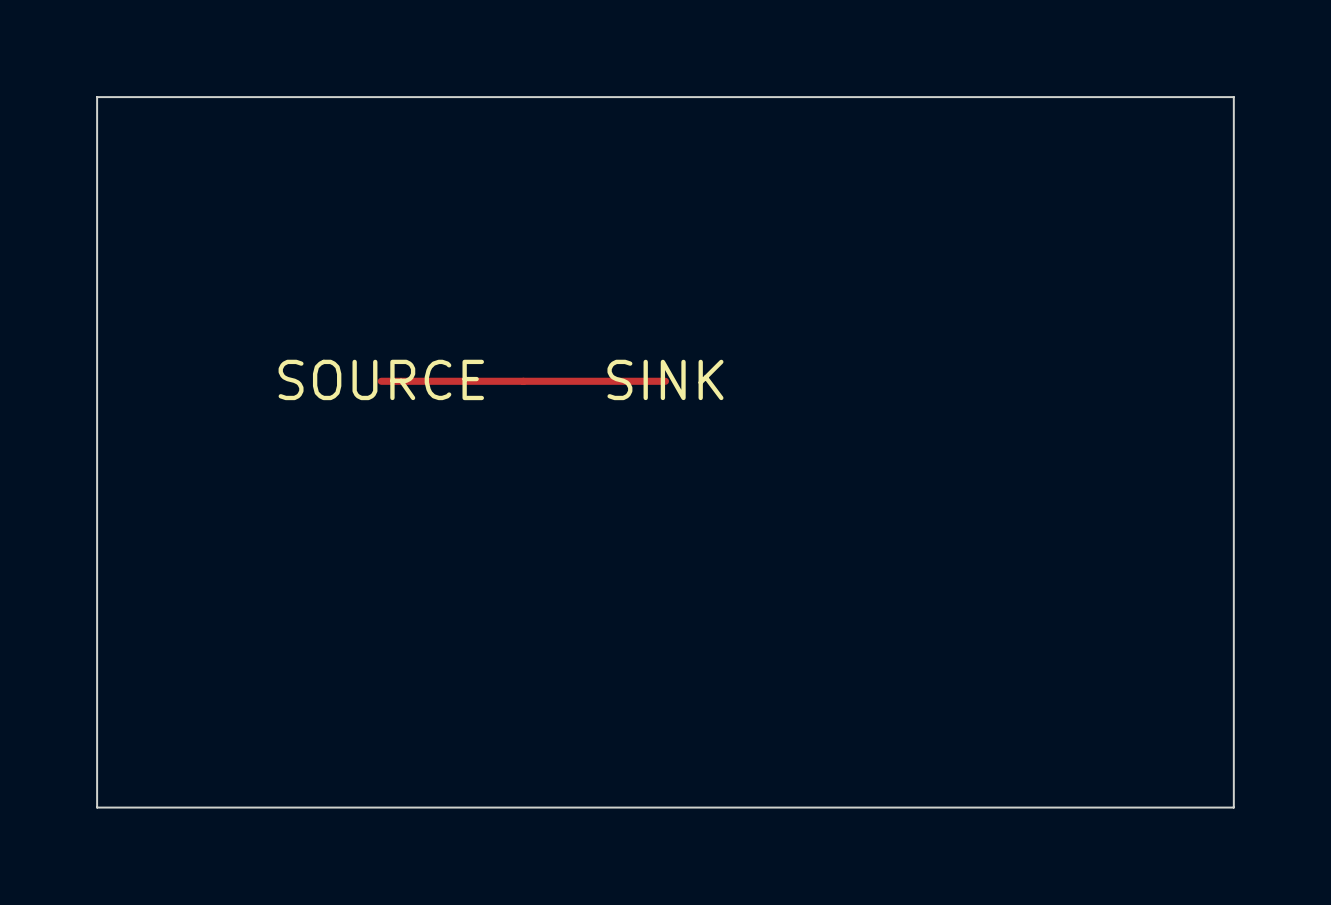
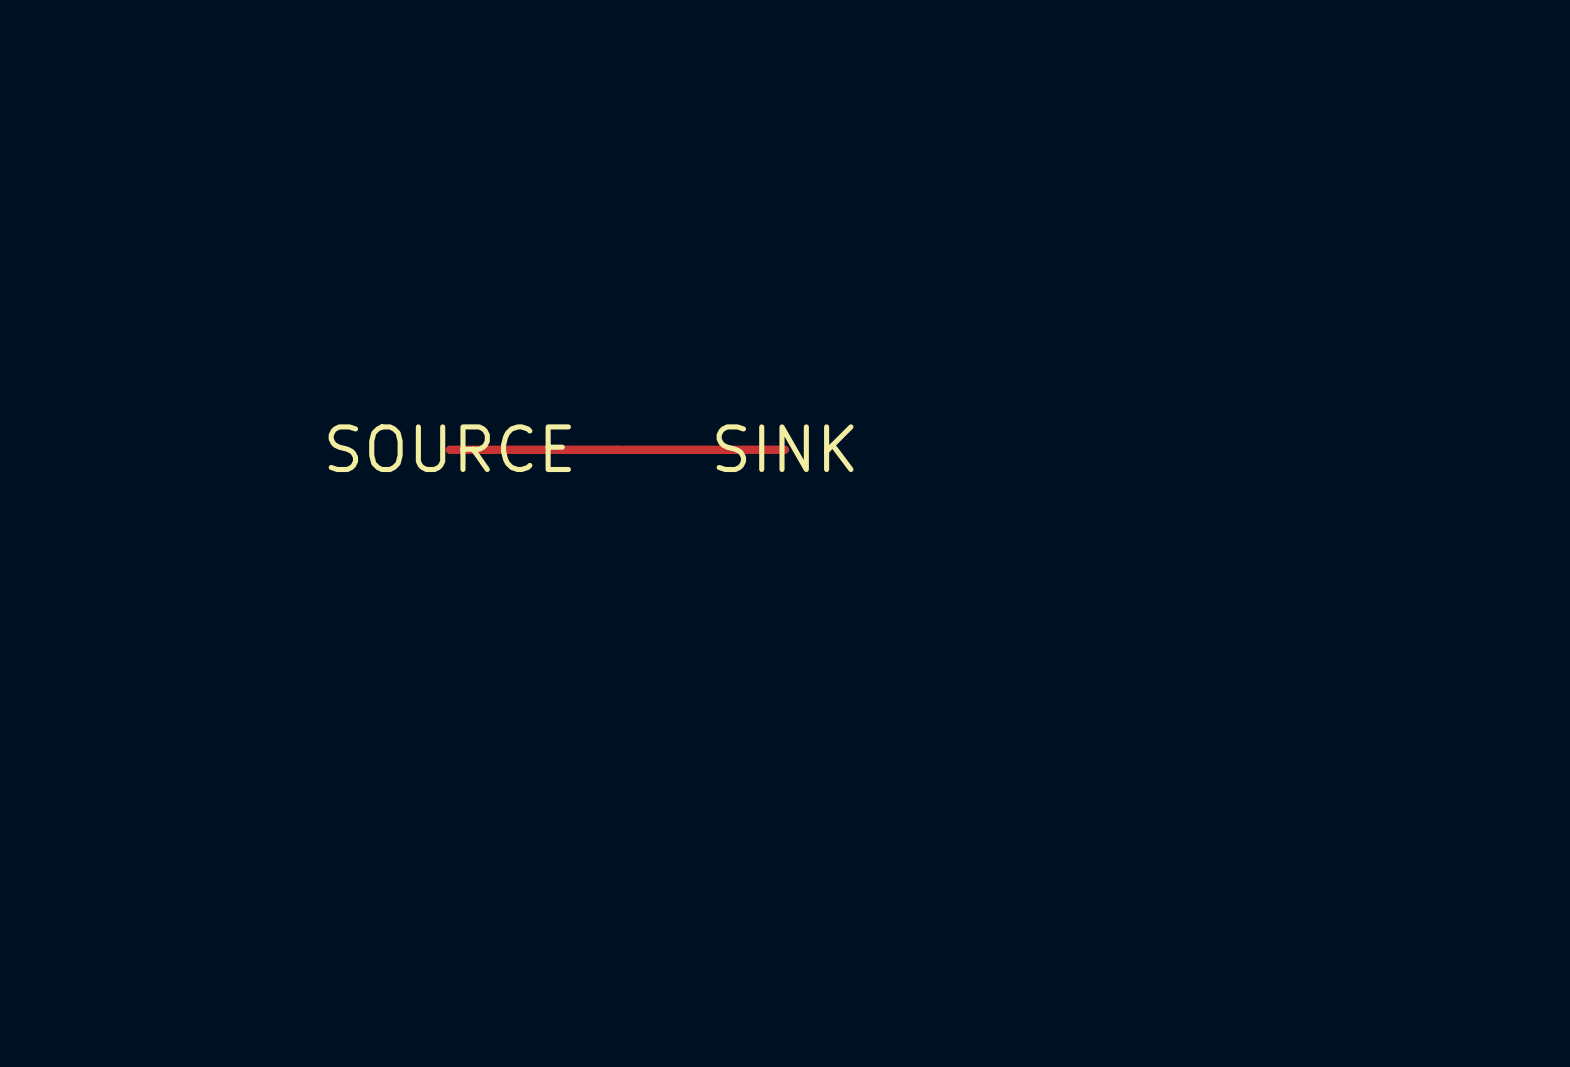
board edge: (97, 97) (1233, 97) (1233, 807) (97, 807) (97, 97) -> none

